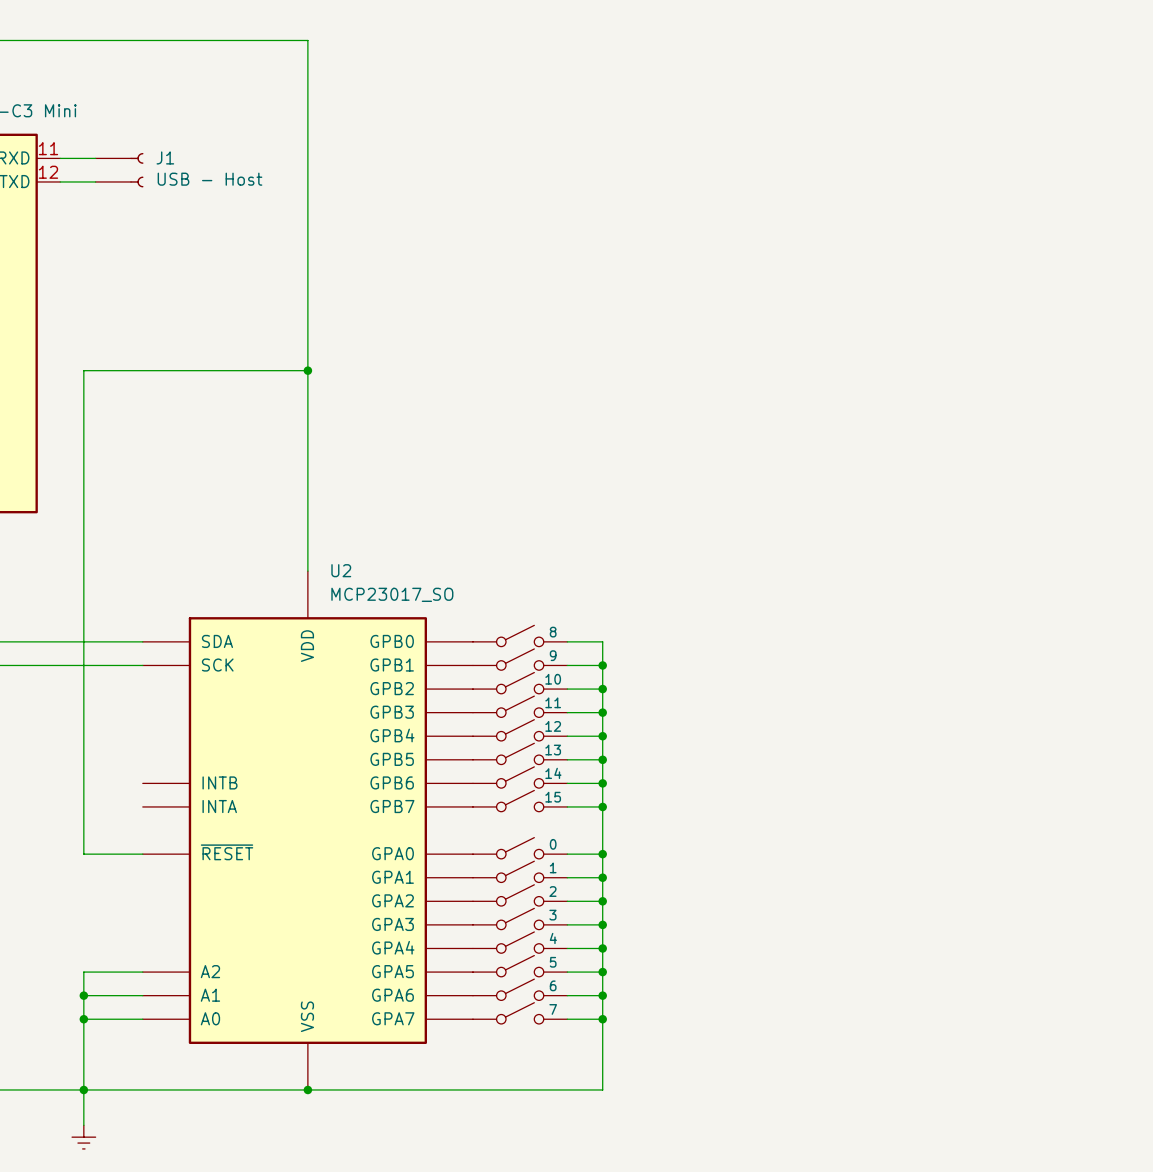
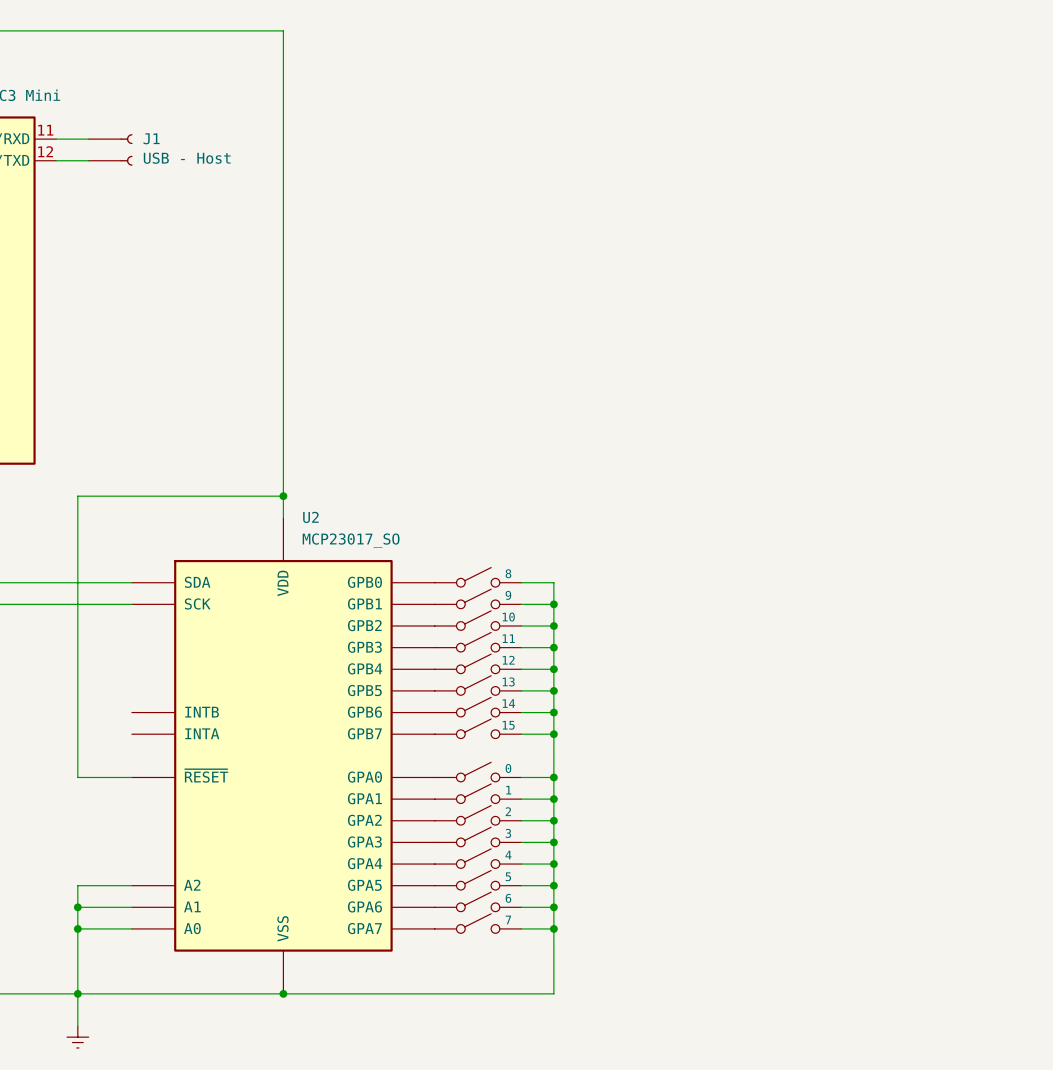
wire: (307, 370) (83, 370) (83, 547) -> (283, 496) (77, 496)
junction: (307, 370) -> none
junction: none -> (283, 496)

